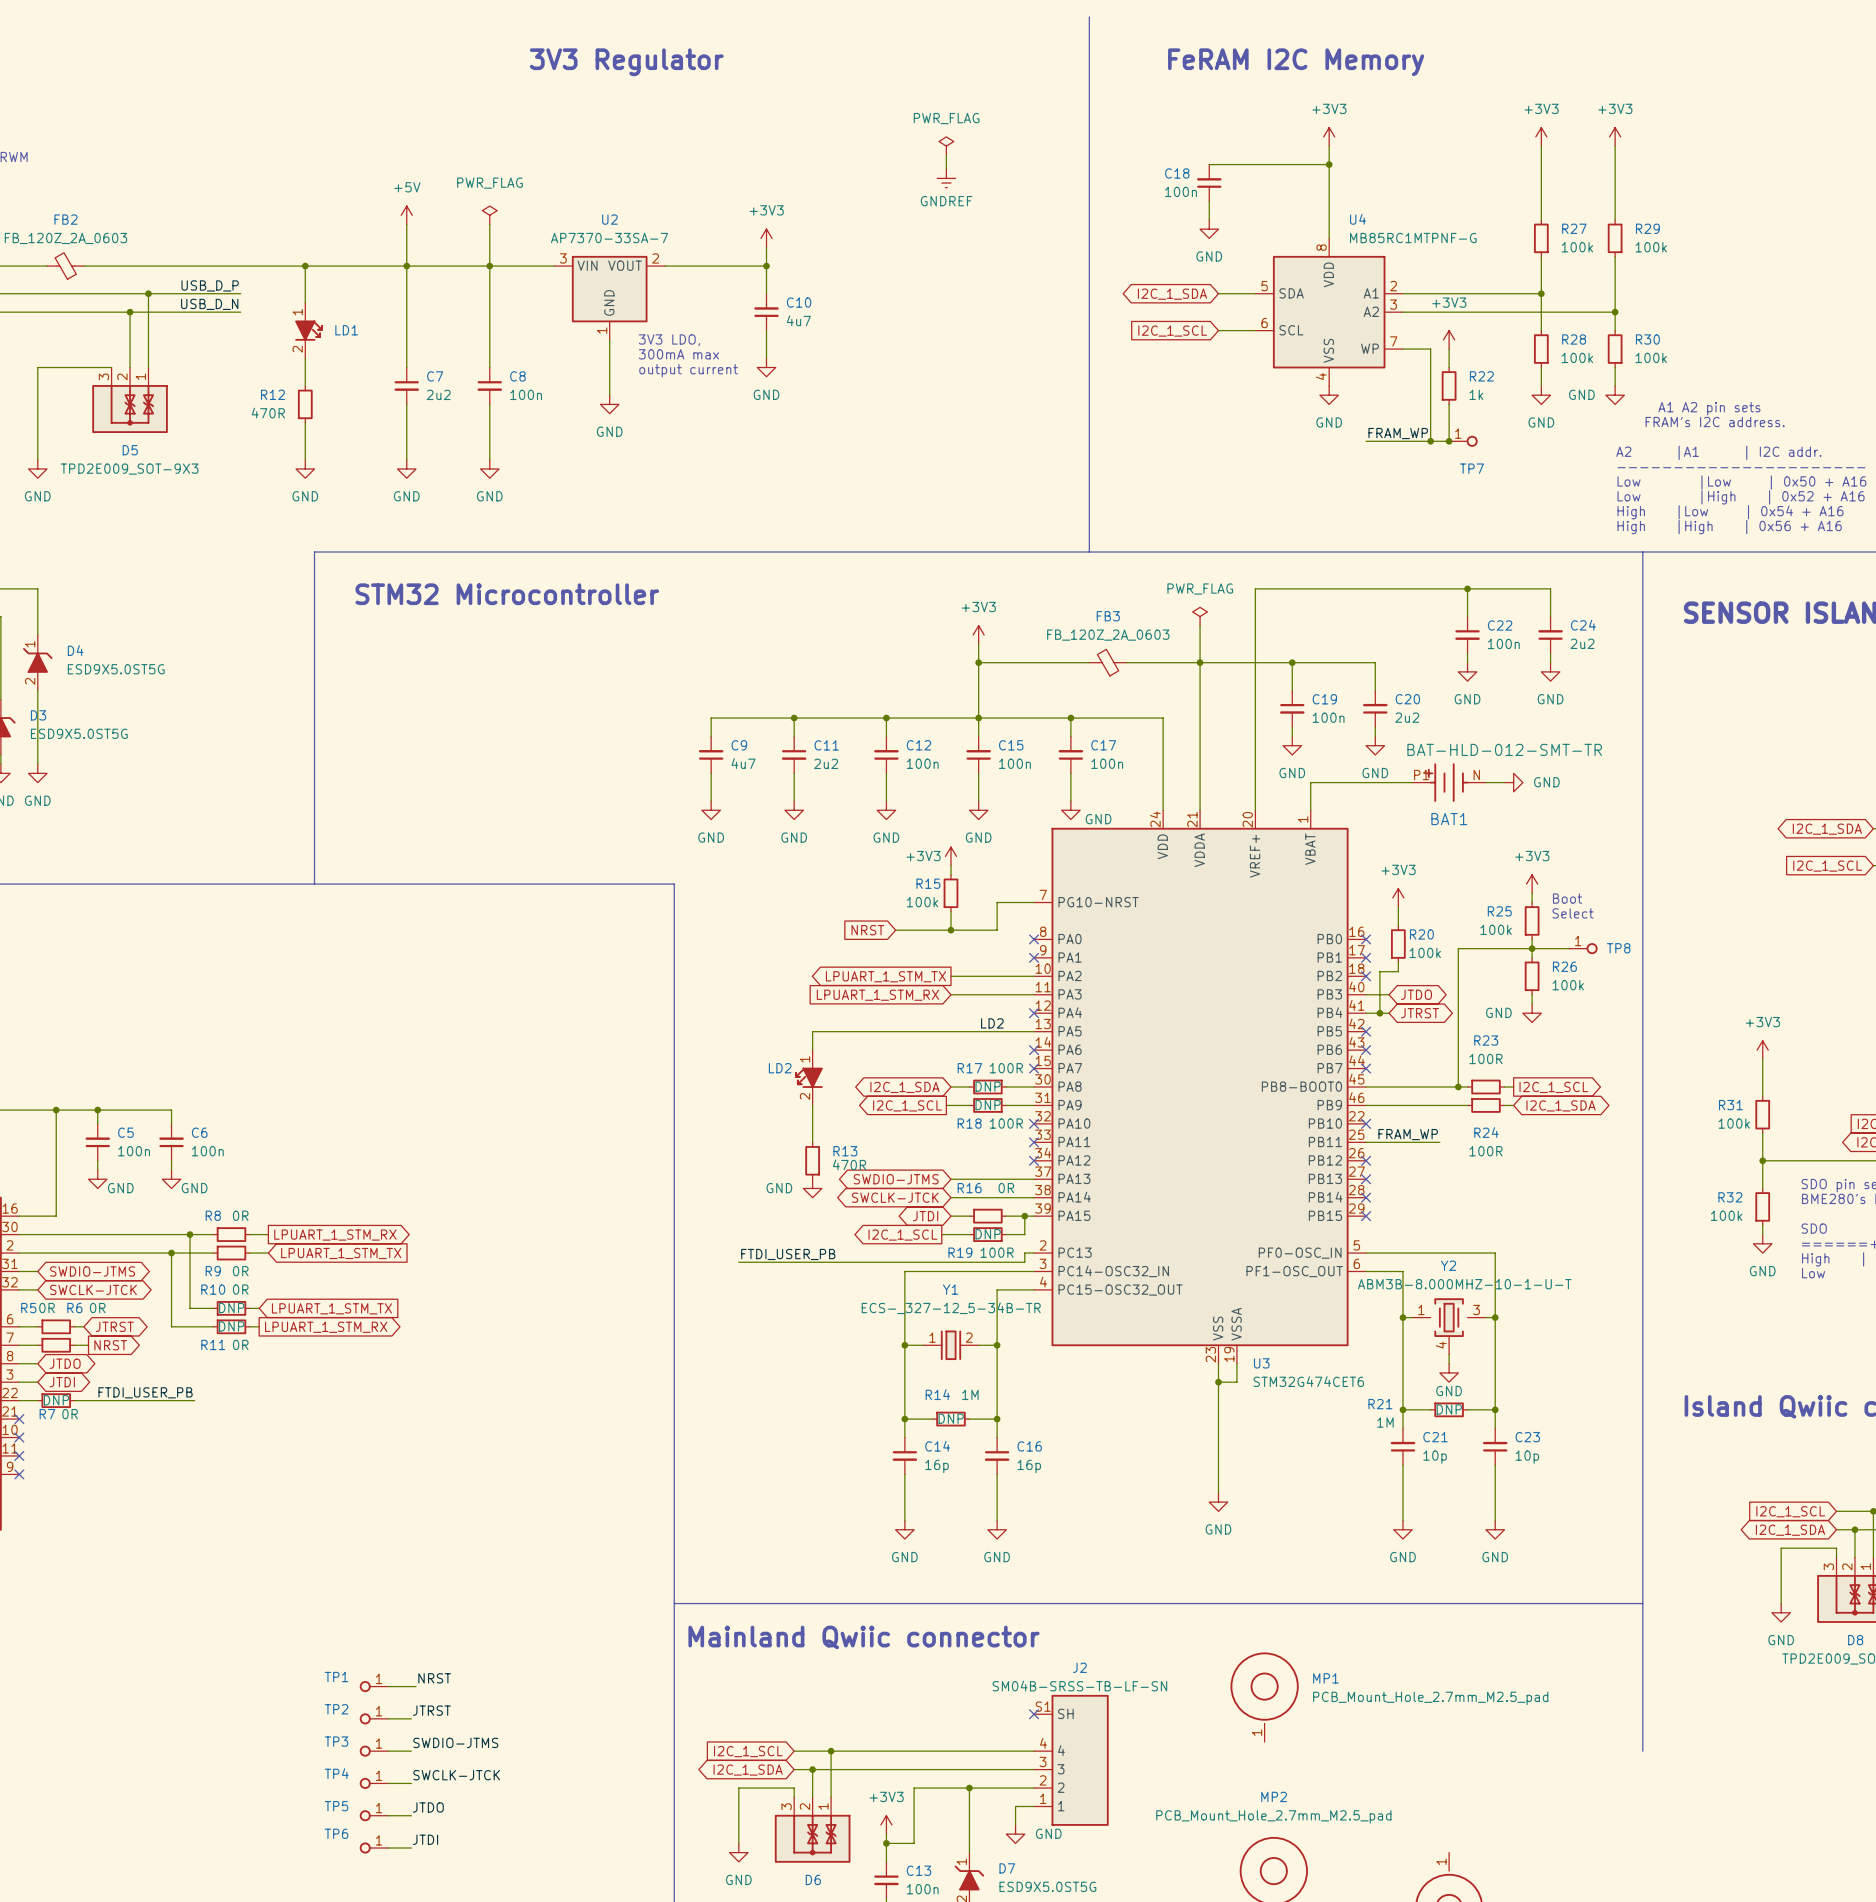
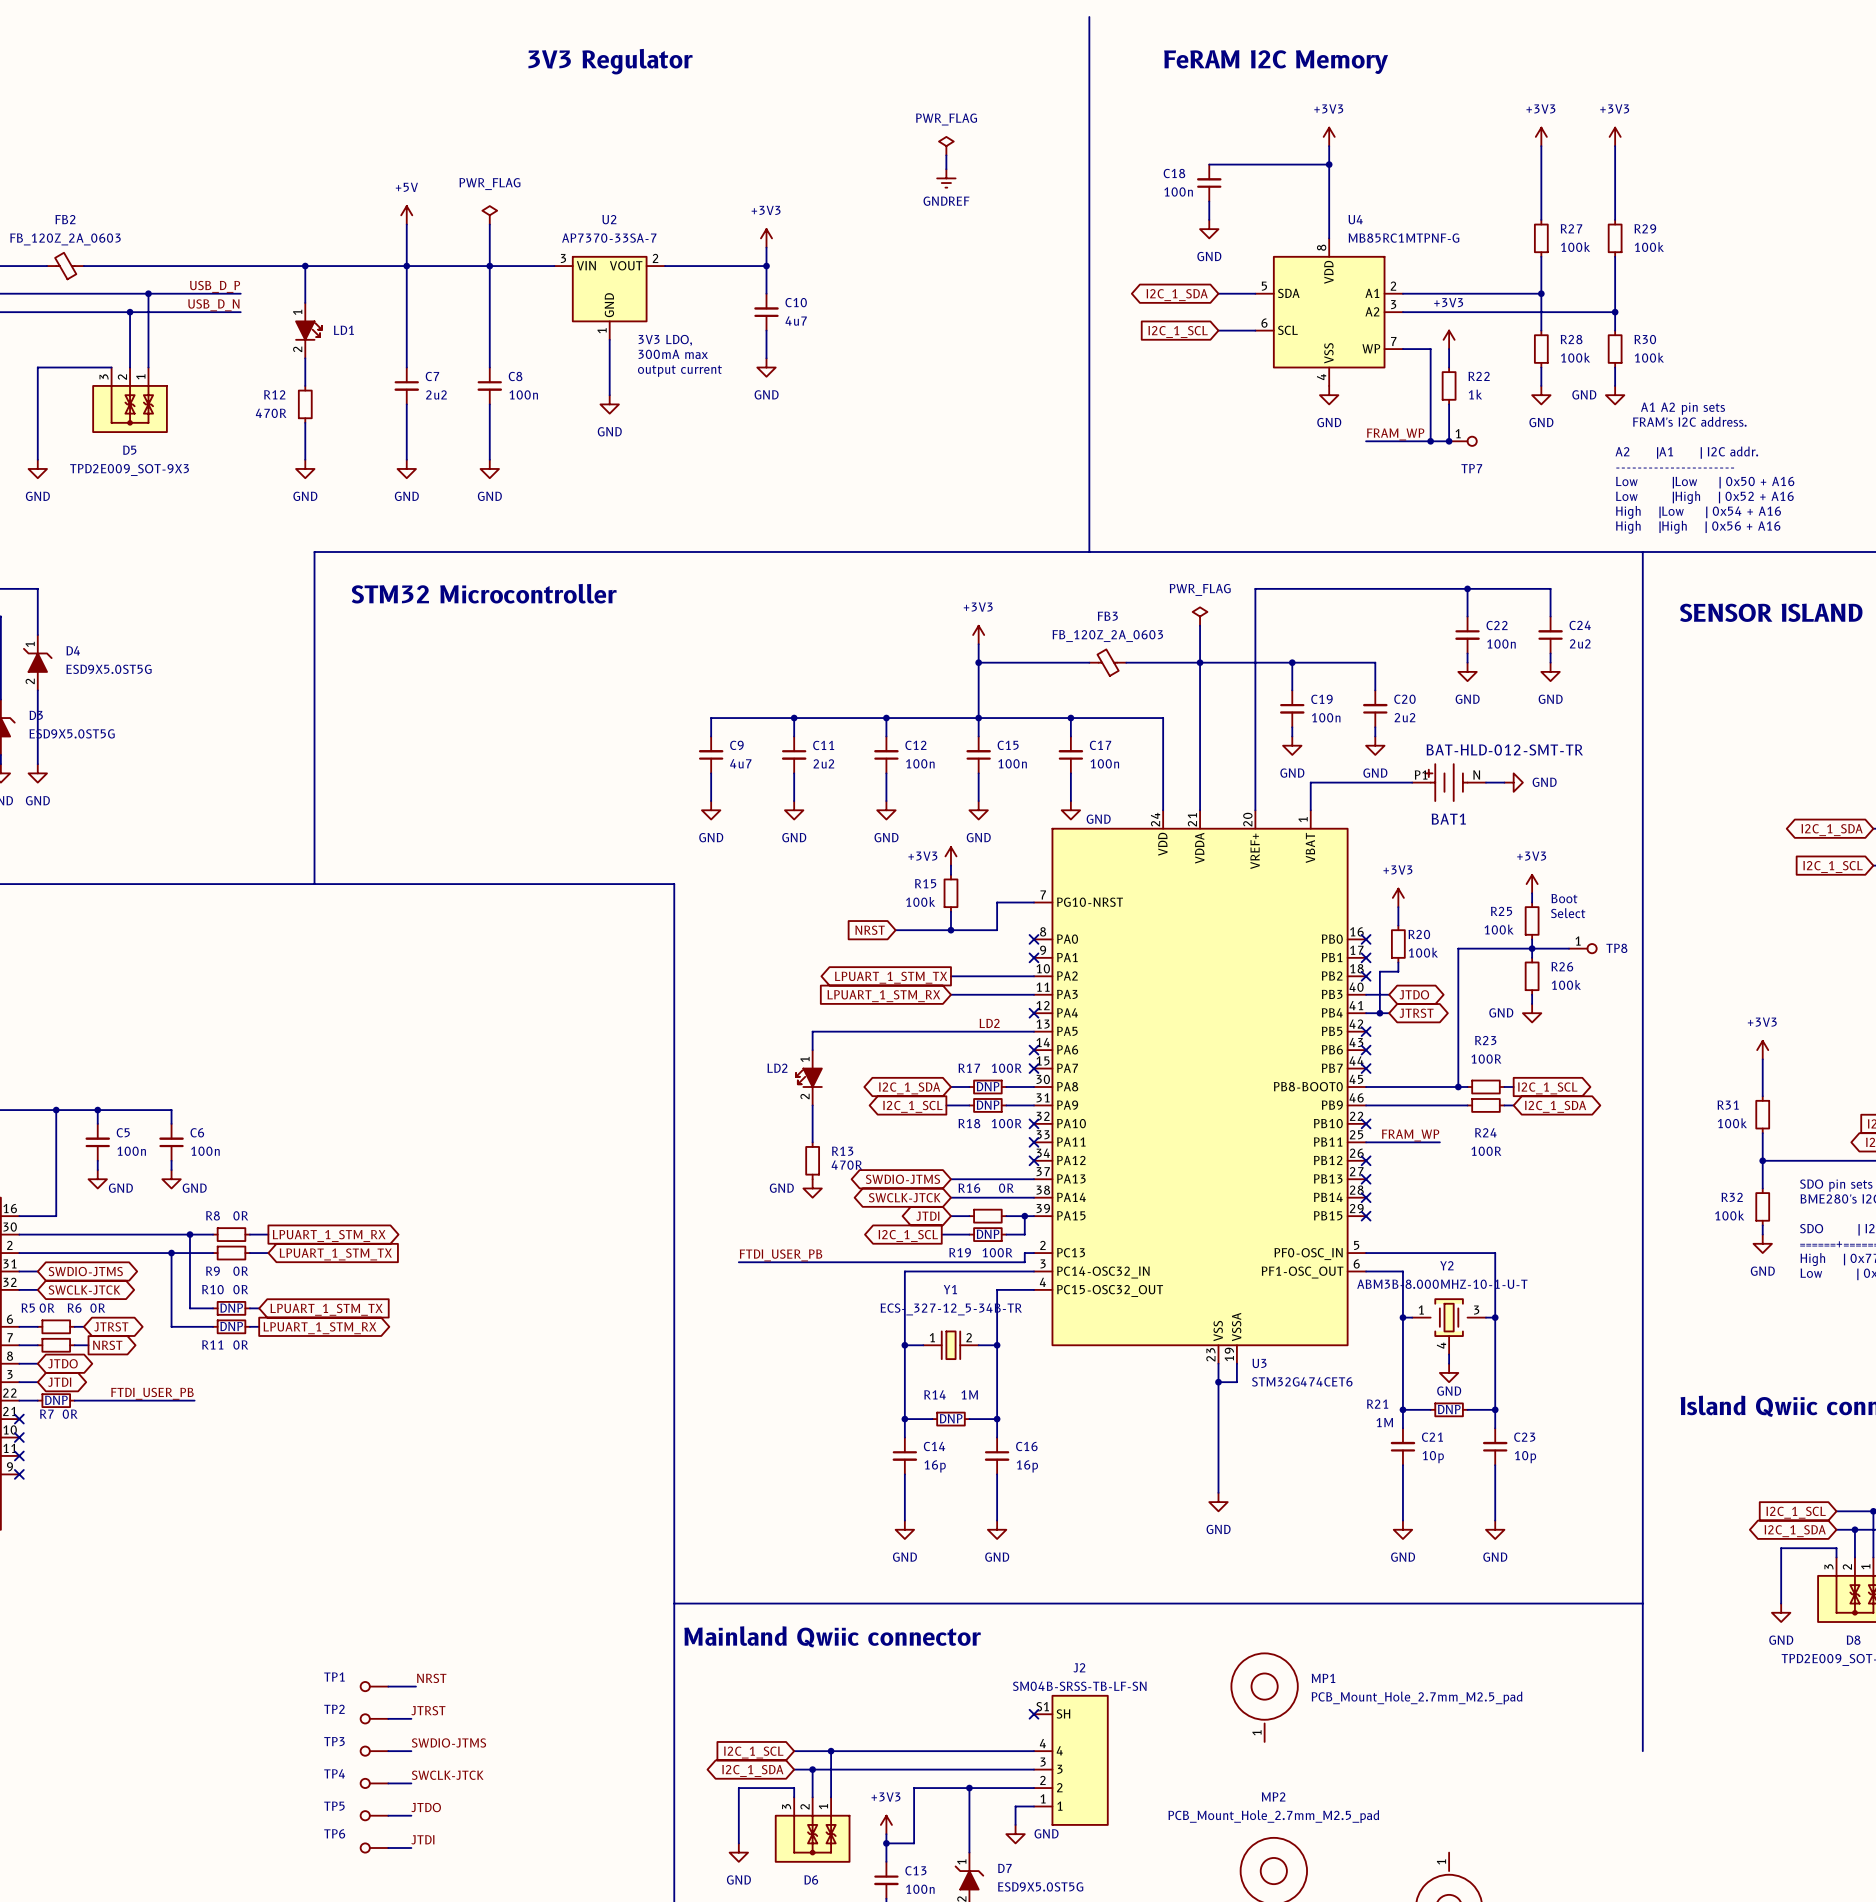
TP1 pin number: 1 (379, 1678) -> none
TP2 pin number: 1 (379, 1711) -> none
TP3 pin number: 1 (379, 1743) -> none
TP4 pin number: 1 (379, 1775) -> none
TP5 pin number: 1 (379, 1808) -> none
TP6 pin number: 1 (379, 1840) -> none

